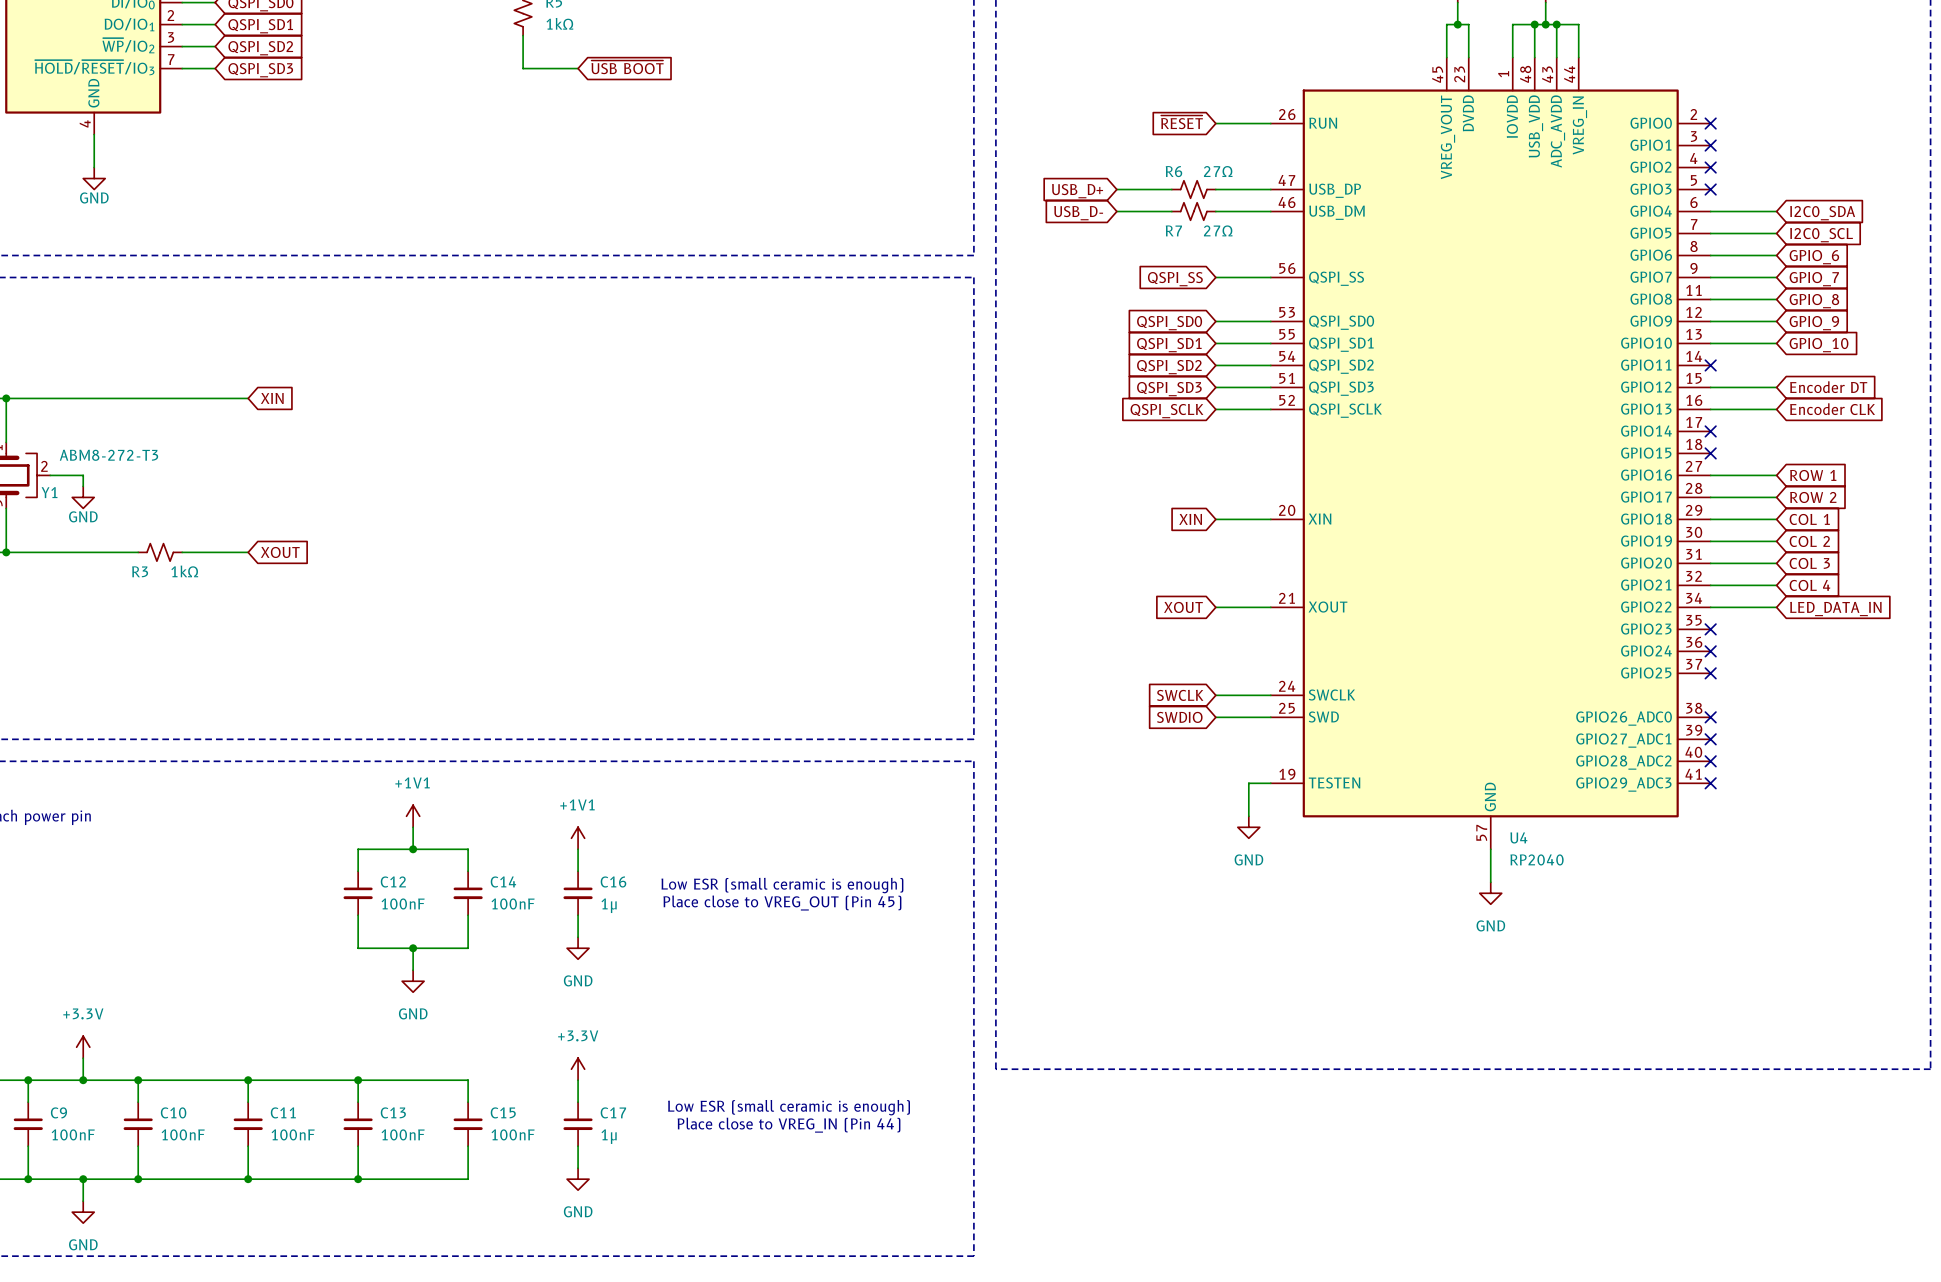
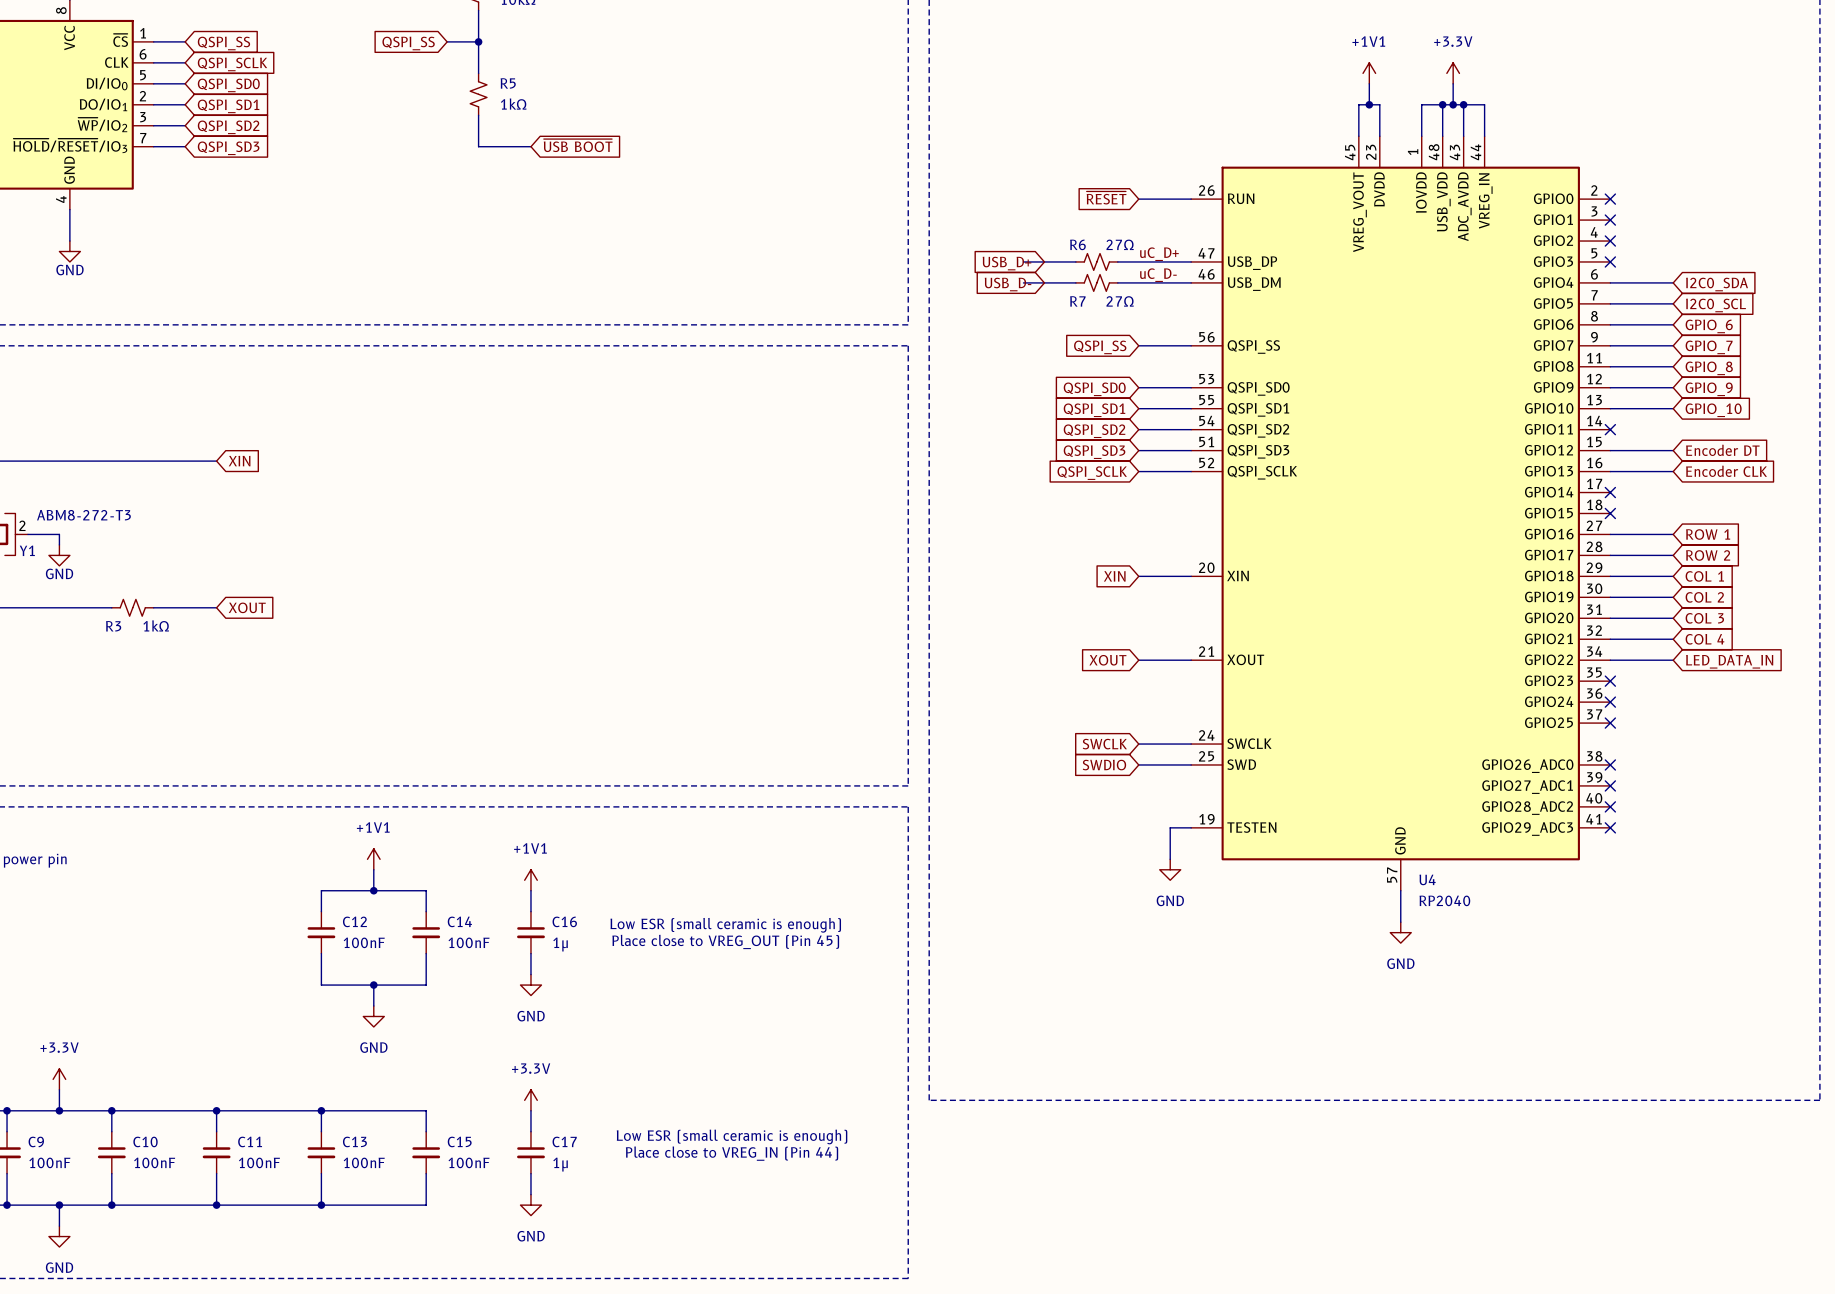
label: none -> uC_D+ (1159, 254)
wire: none -> (1023, 261) (1044, 261)
R6 position: (1193, 189) -> (1096, 261)
label: none -> uC_D- (1158, 275)
wire: none -> (1023, 282) (1044, 282)
R7 position: (1193, 211) -> (1096, 282)

